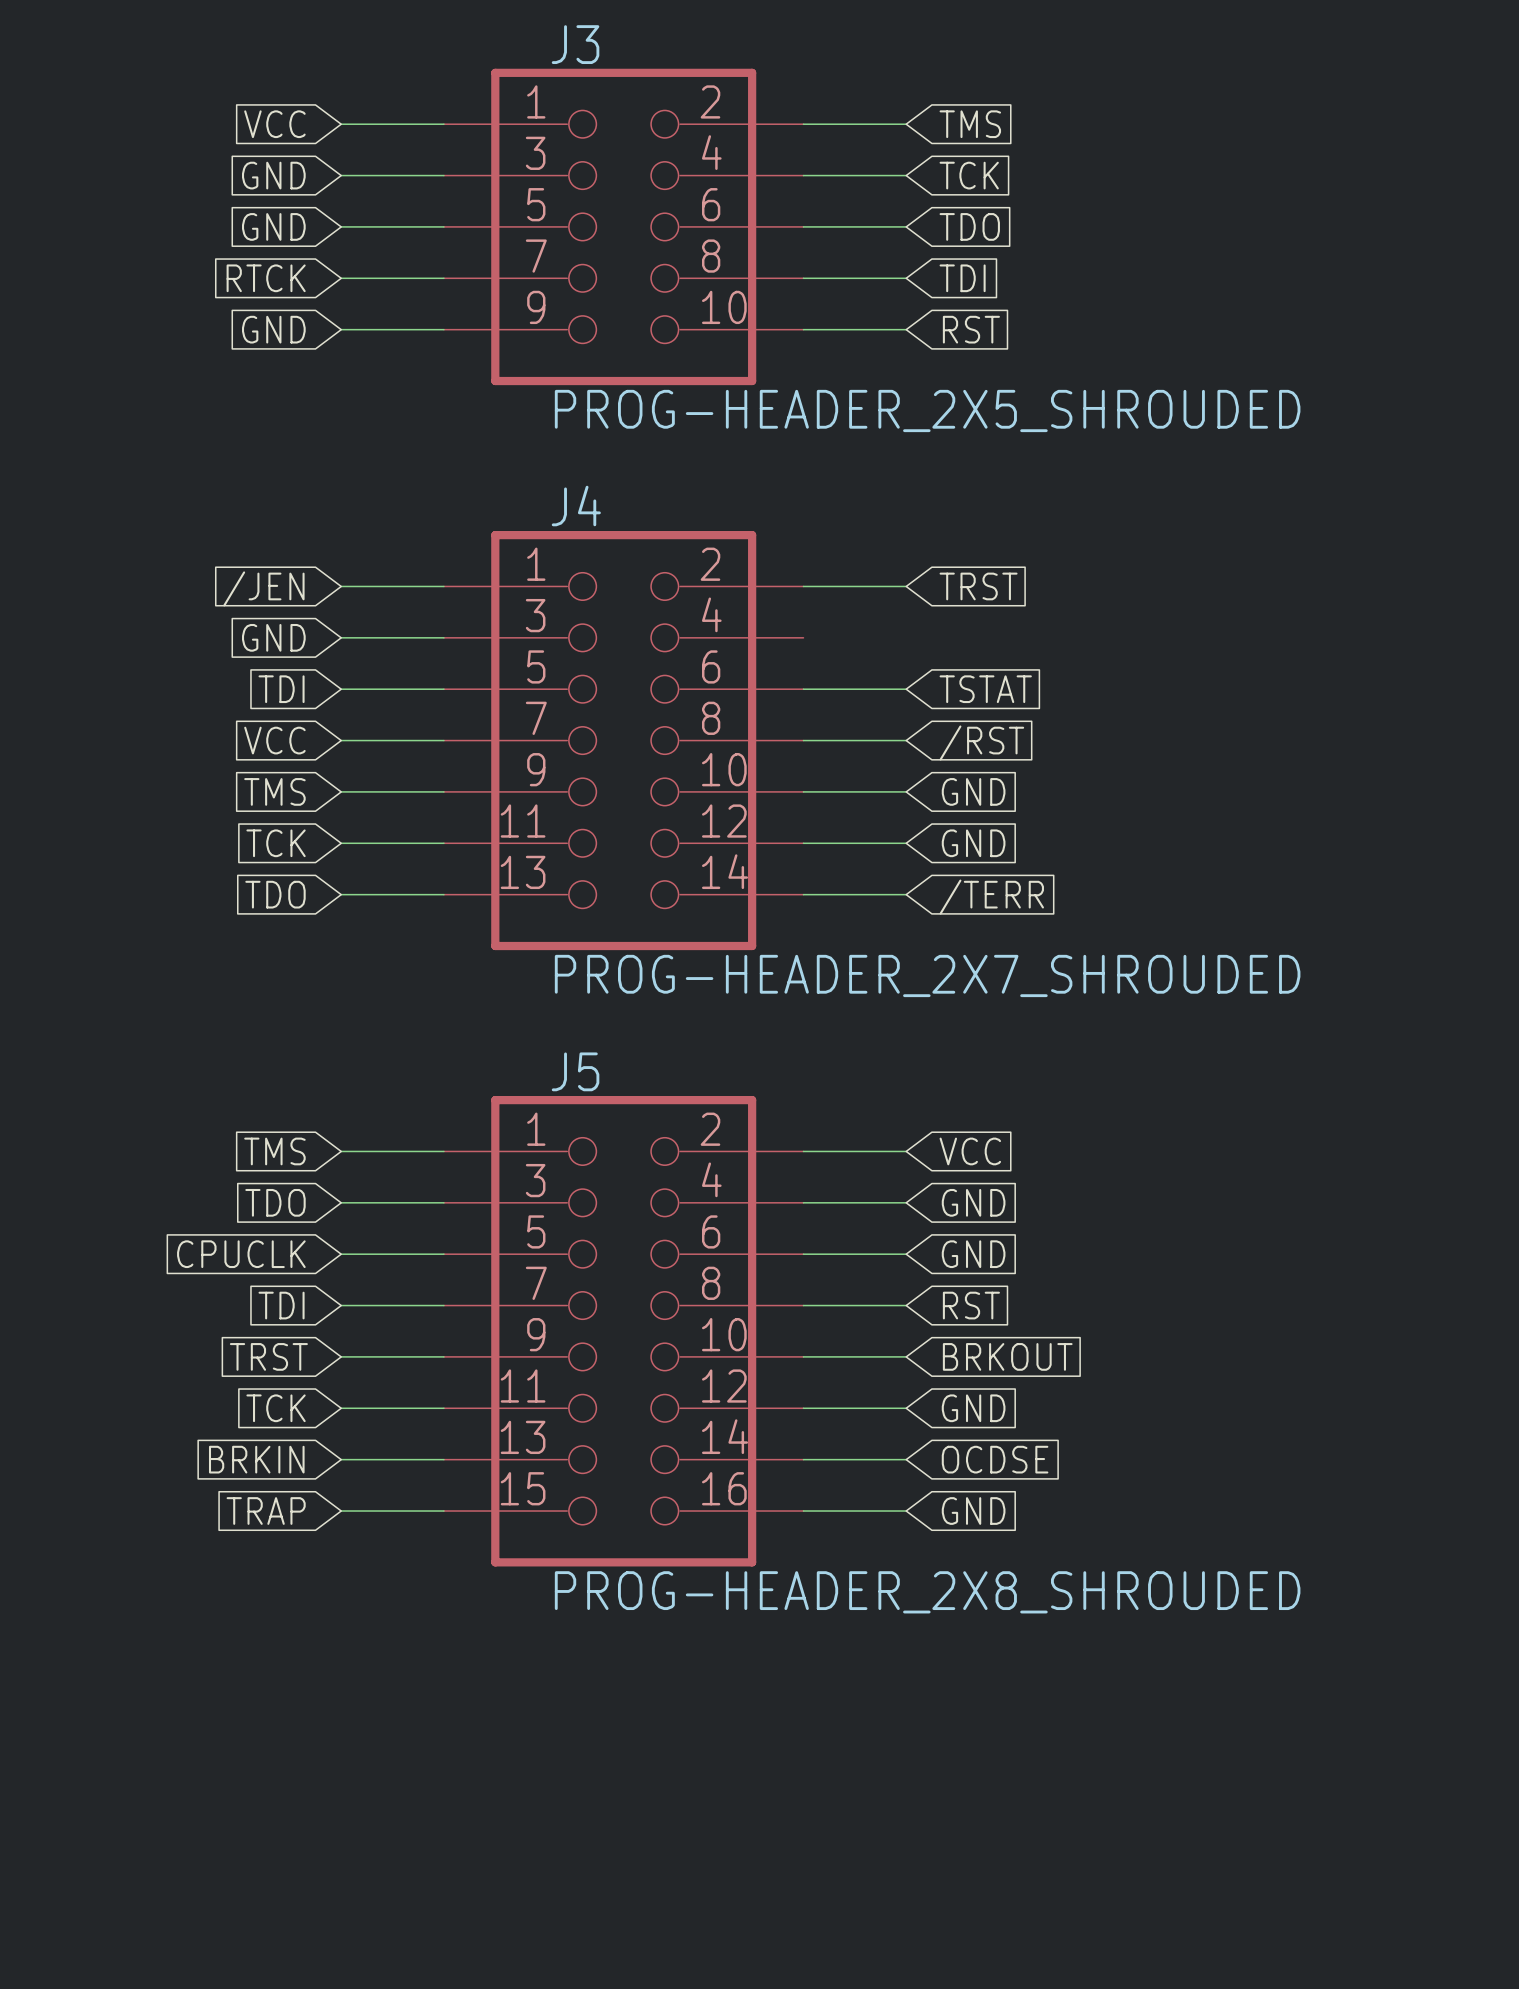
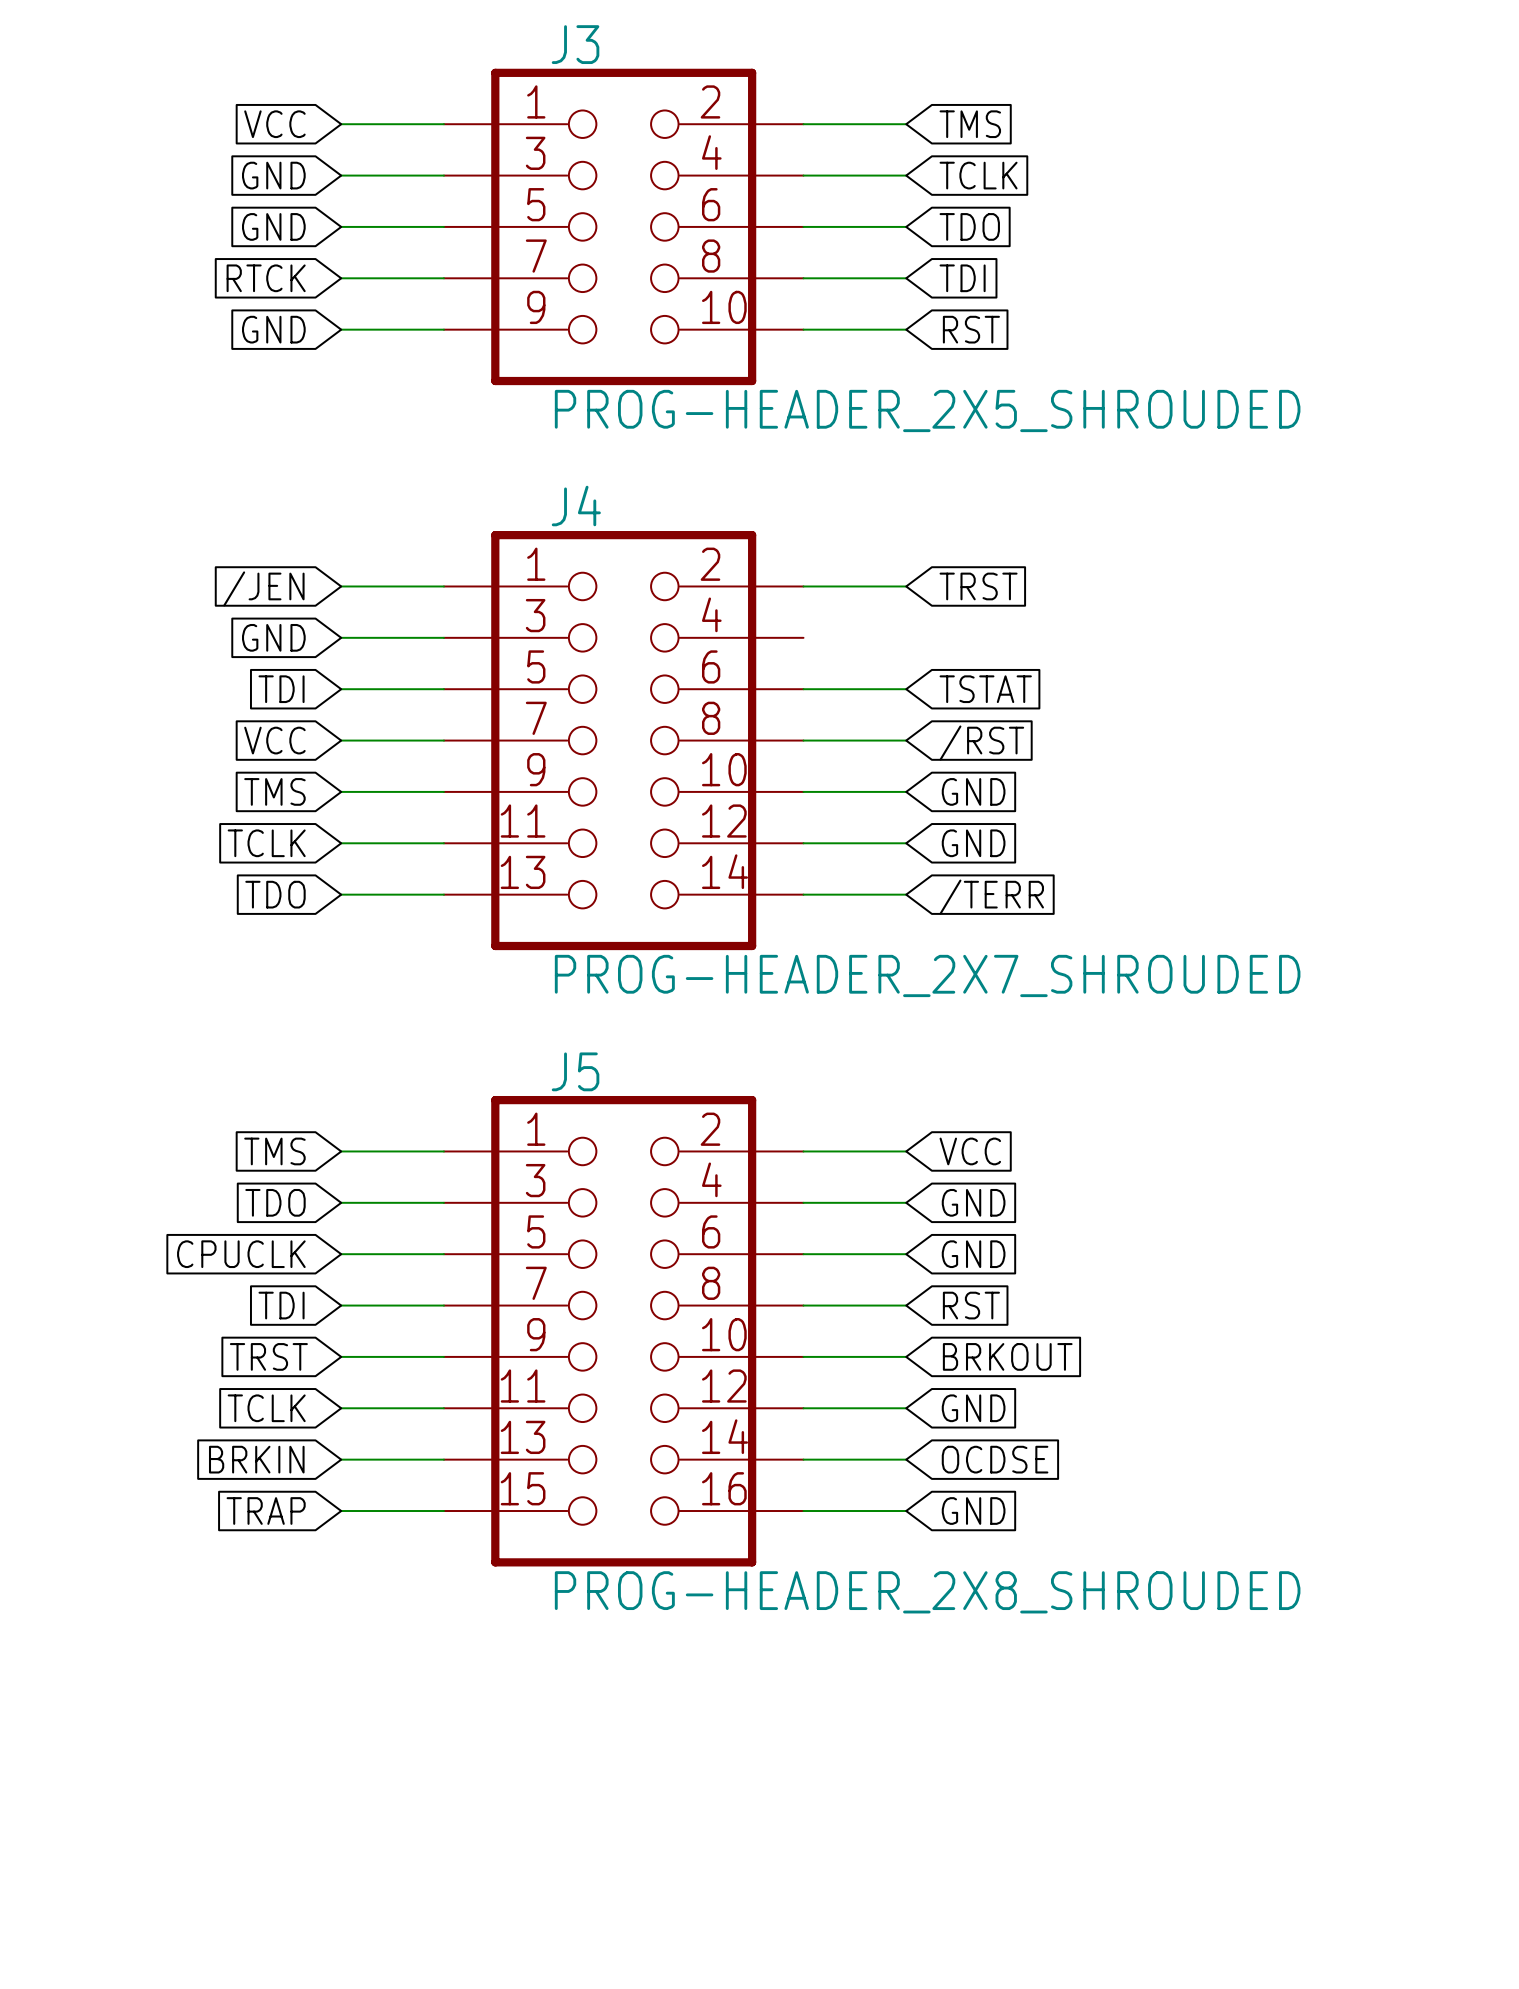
global label: TCK (969, 175) -> TCLK (978, 175)
global label: TCK (276, 843) -> TCLK (266, 843)
global label: TCK (276, 1408) -> TCLK (266, 1408)

